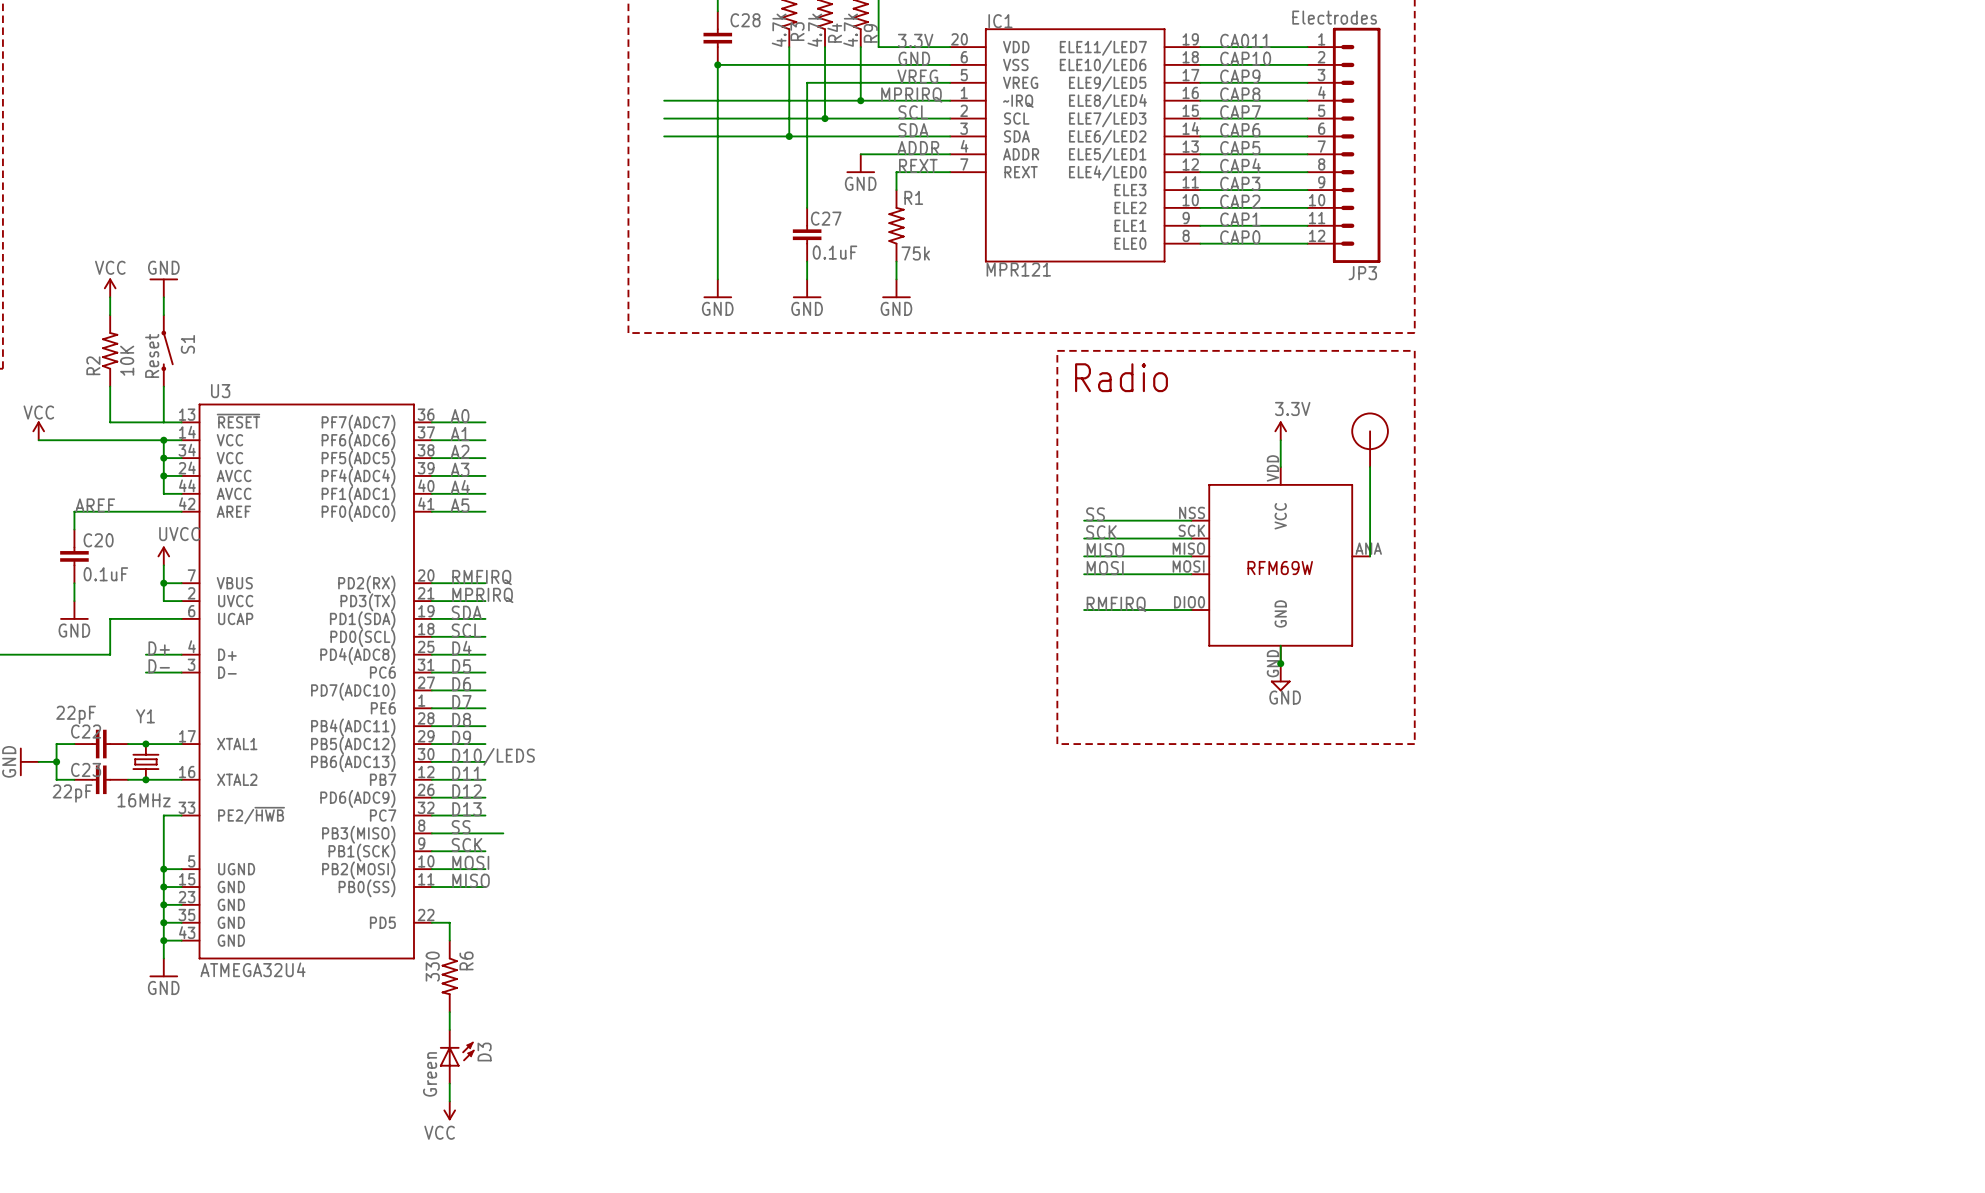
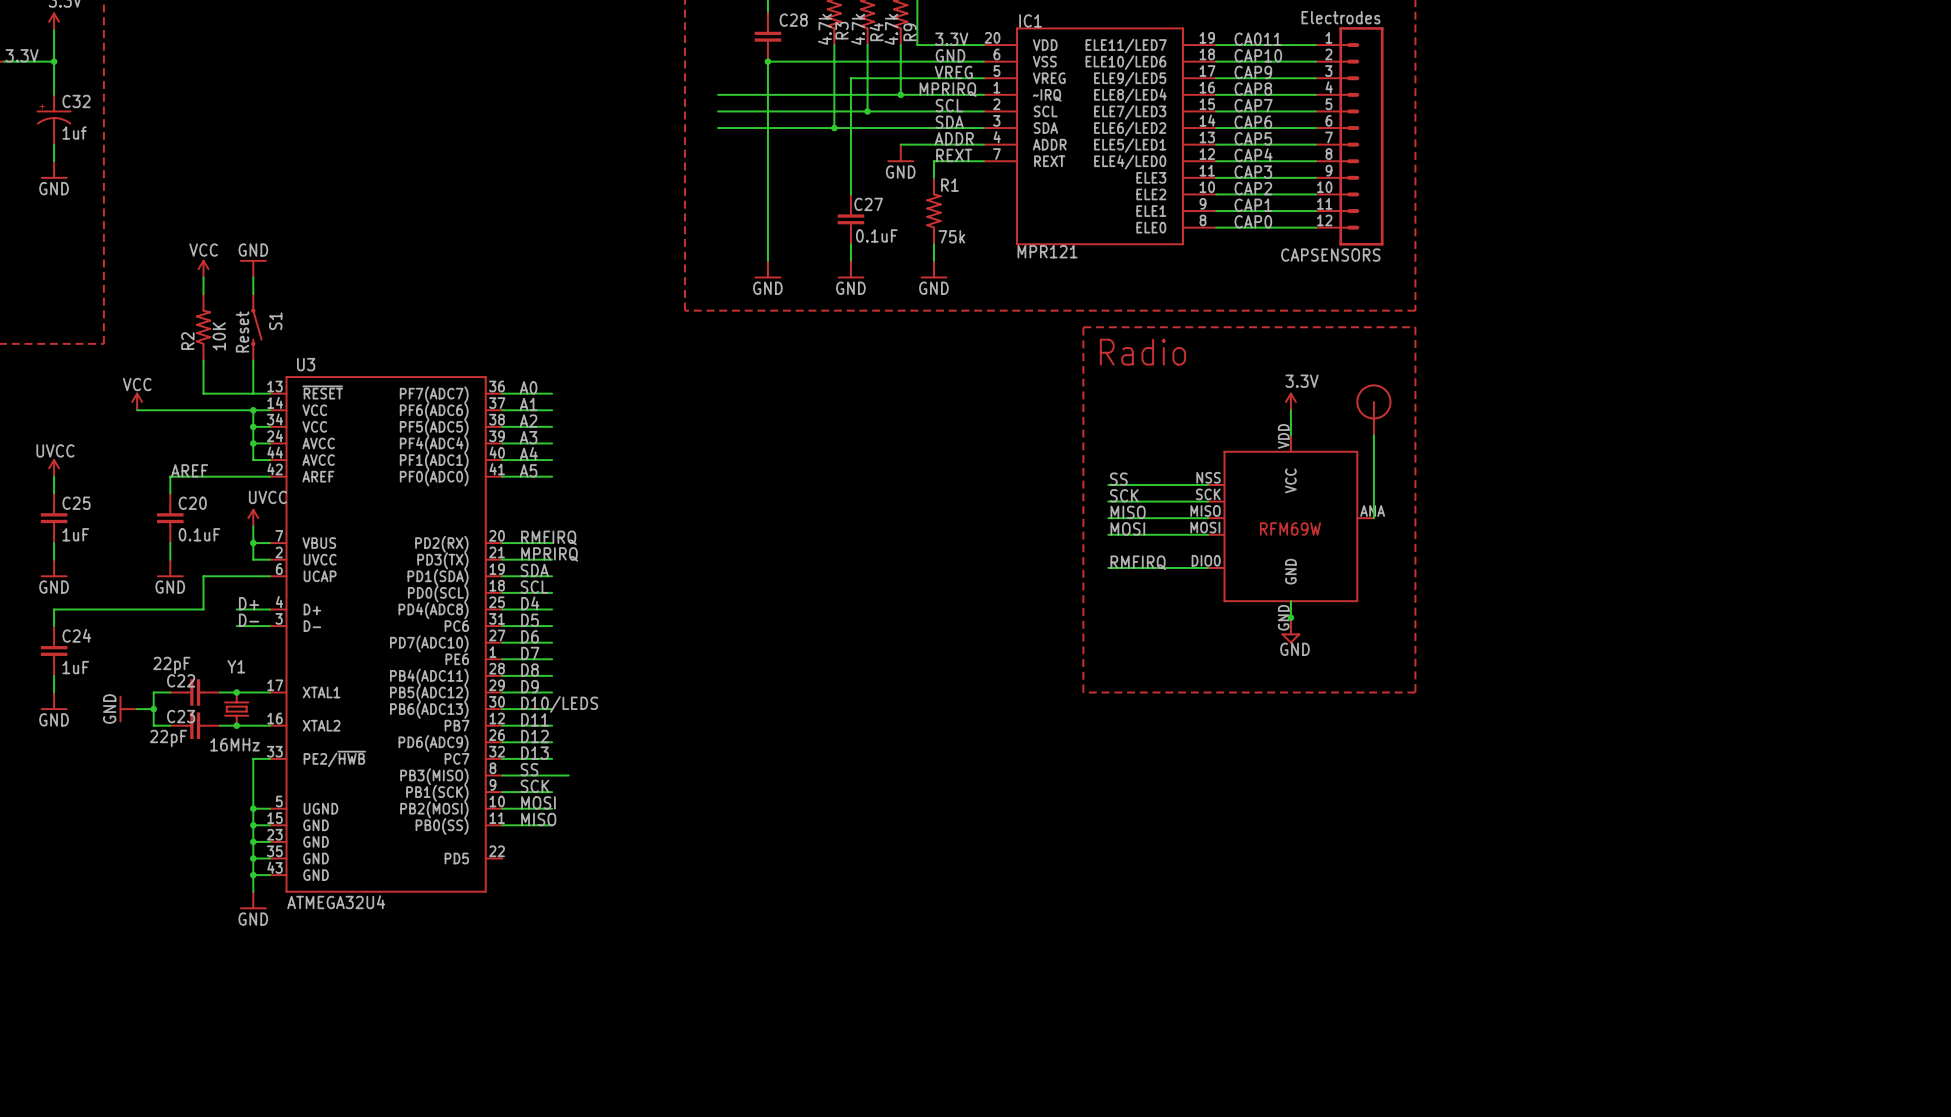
JP3 name: JP3 (1362, 273) -> CAPSENSORS (1330, 255)
wire: (431, 922) (449, 922) (449, 940) -> none
R6: 330 (449, 976) -> none
wire: (449, 1012) (449, 1029) -> none
D3: Green (457, 1056) -> none
wire: (449, 1083) (449, 1101) -> none
power symbol: VCC (449, 1110) -> none

